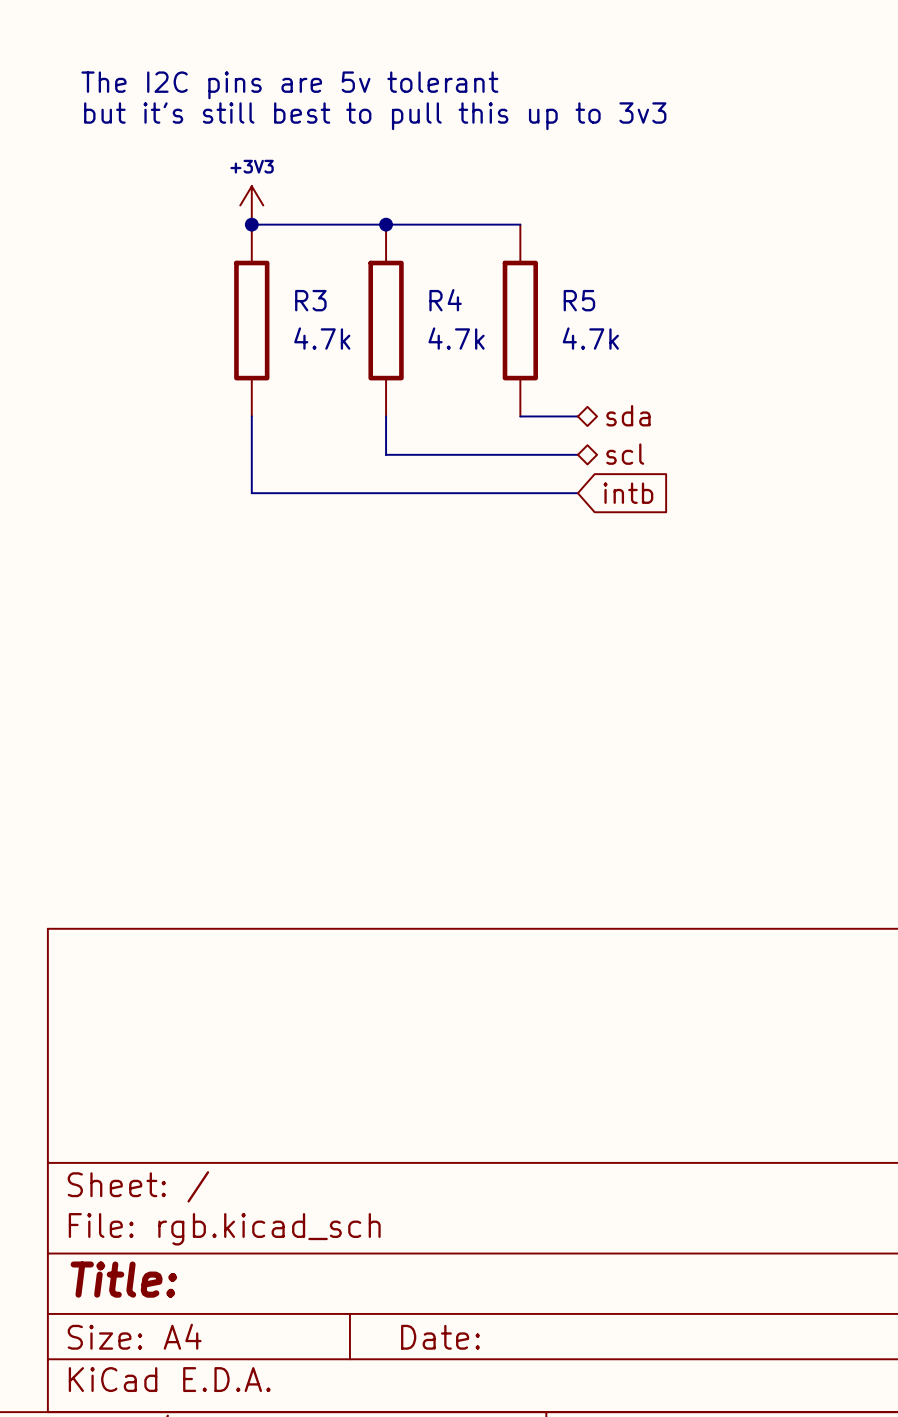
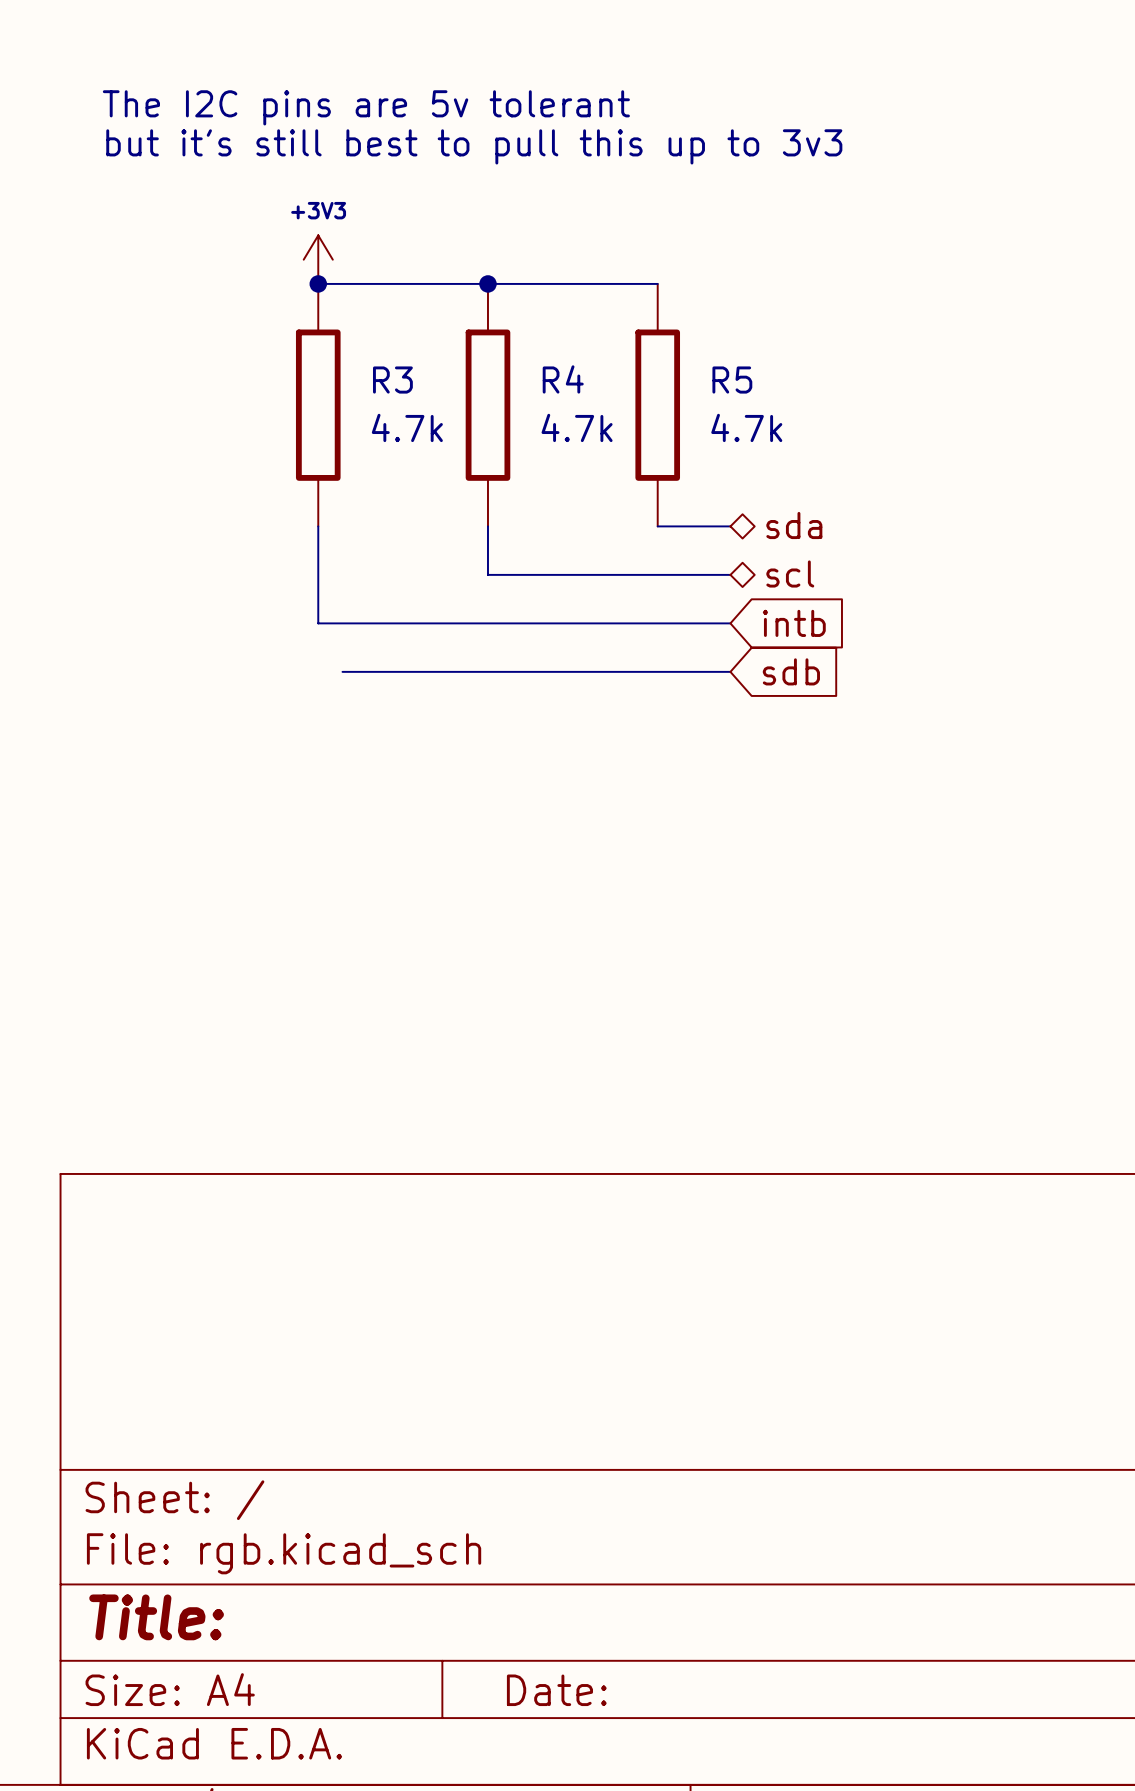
wire: none -> (342, 671) (730, 671)
global label: none -> sdb (791, 671)

